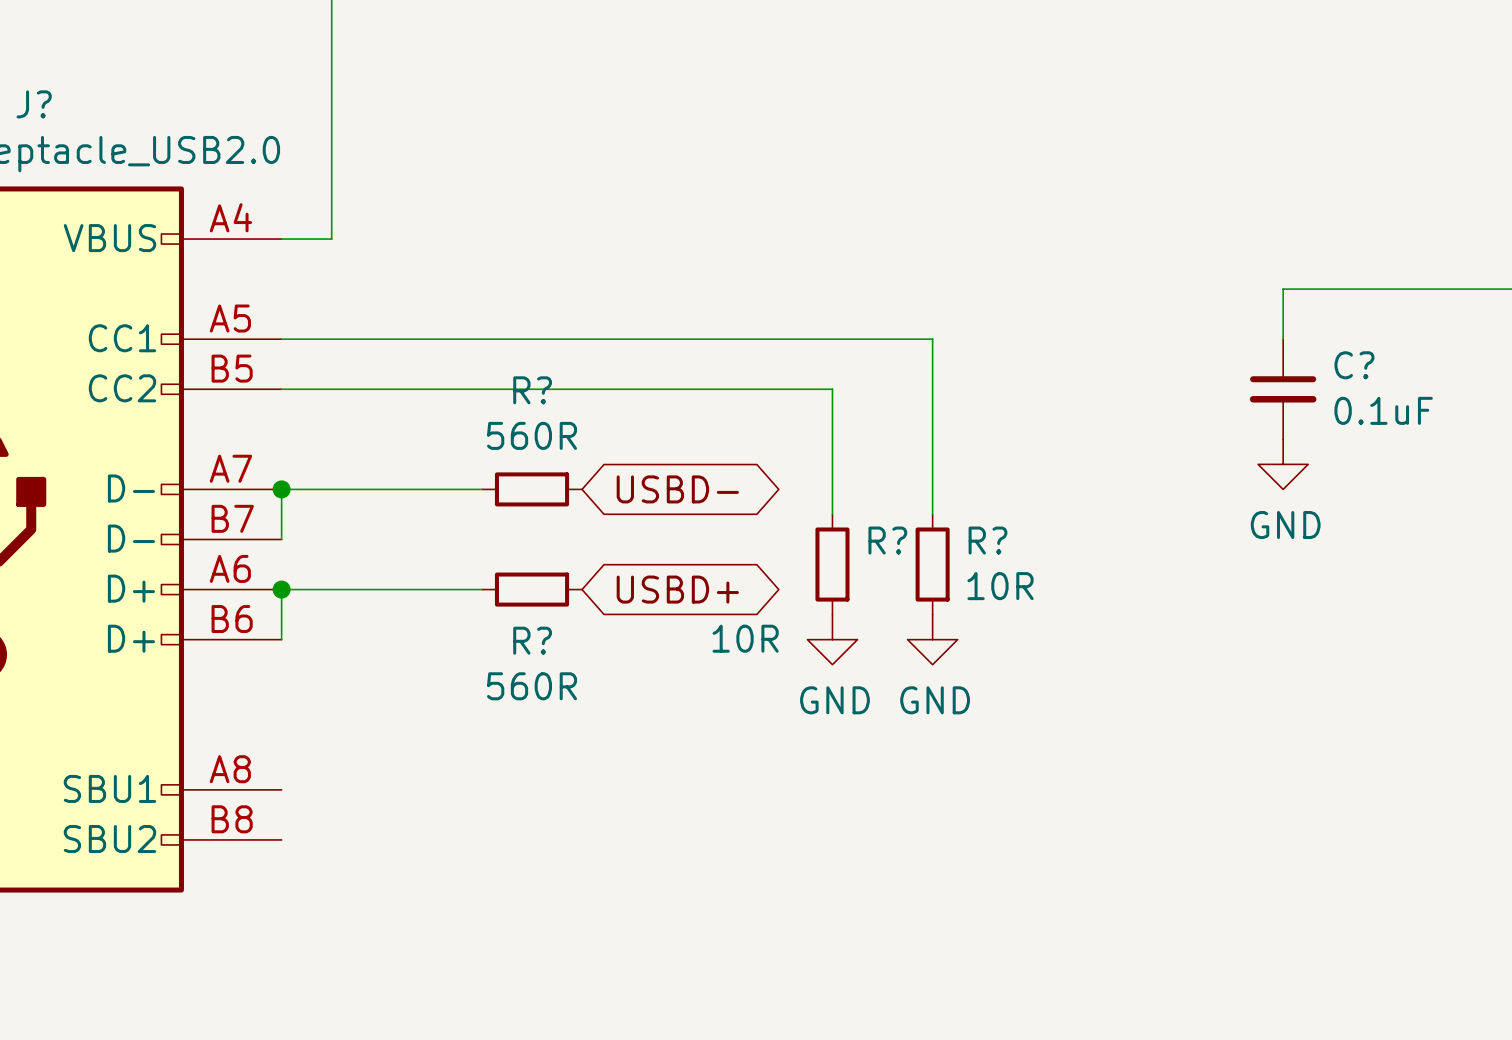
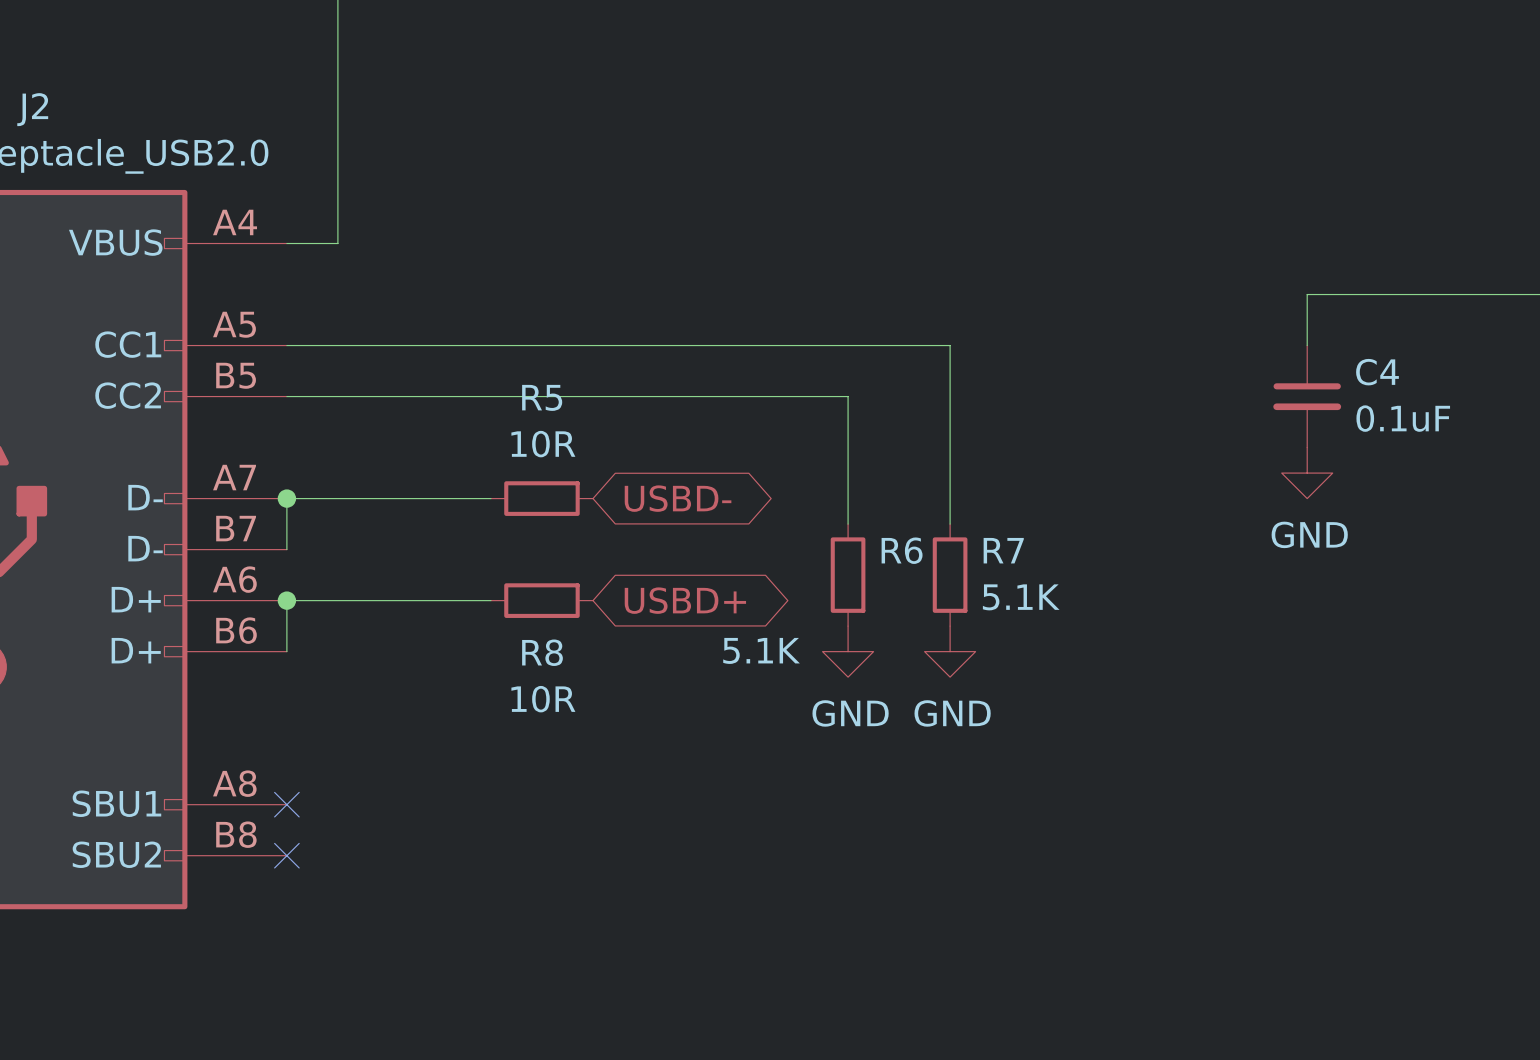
J? name: J? (34, 104) -> J2 (32, 109)
C? name: C? (1354, 365) -> C4 (1377, 372)
R? name: R? (532, 390) -> R5 (542, 397)
R? value: 560R (532, 435) -> 10R (543, 444)
R? name: R? (887, 540) -> R6 (902, 550)
R? name: R? (987, 540) -> R7 (1003, 550)
R? value: 10R (1000, 586) -> 5.1K (1021, 597)
R? value: 10R (745, 638) -> 5.1K (761, 650)
R? name: R? (532, 640) -> R8 (542, 652)
R? value: 560R (532, 686) -> 10R (543, 699)
no-connect mark: none -> (286, 804)
no-connect mark: none -> (286, 855)

